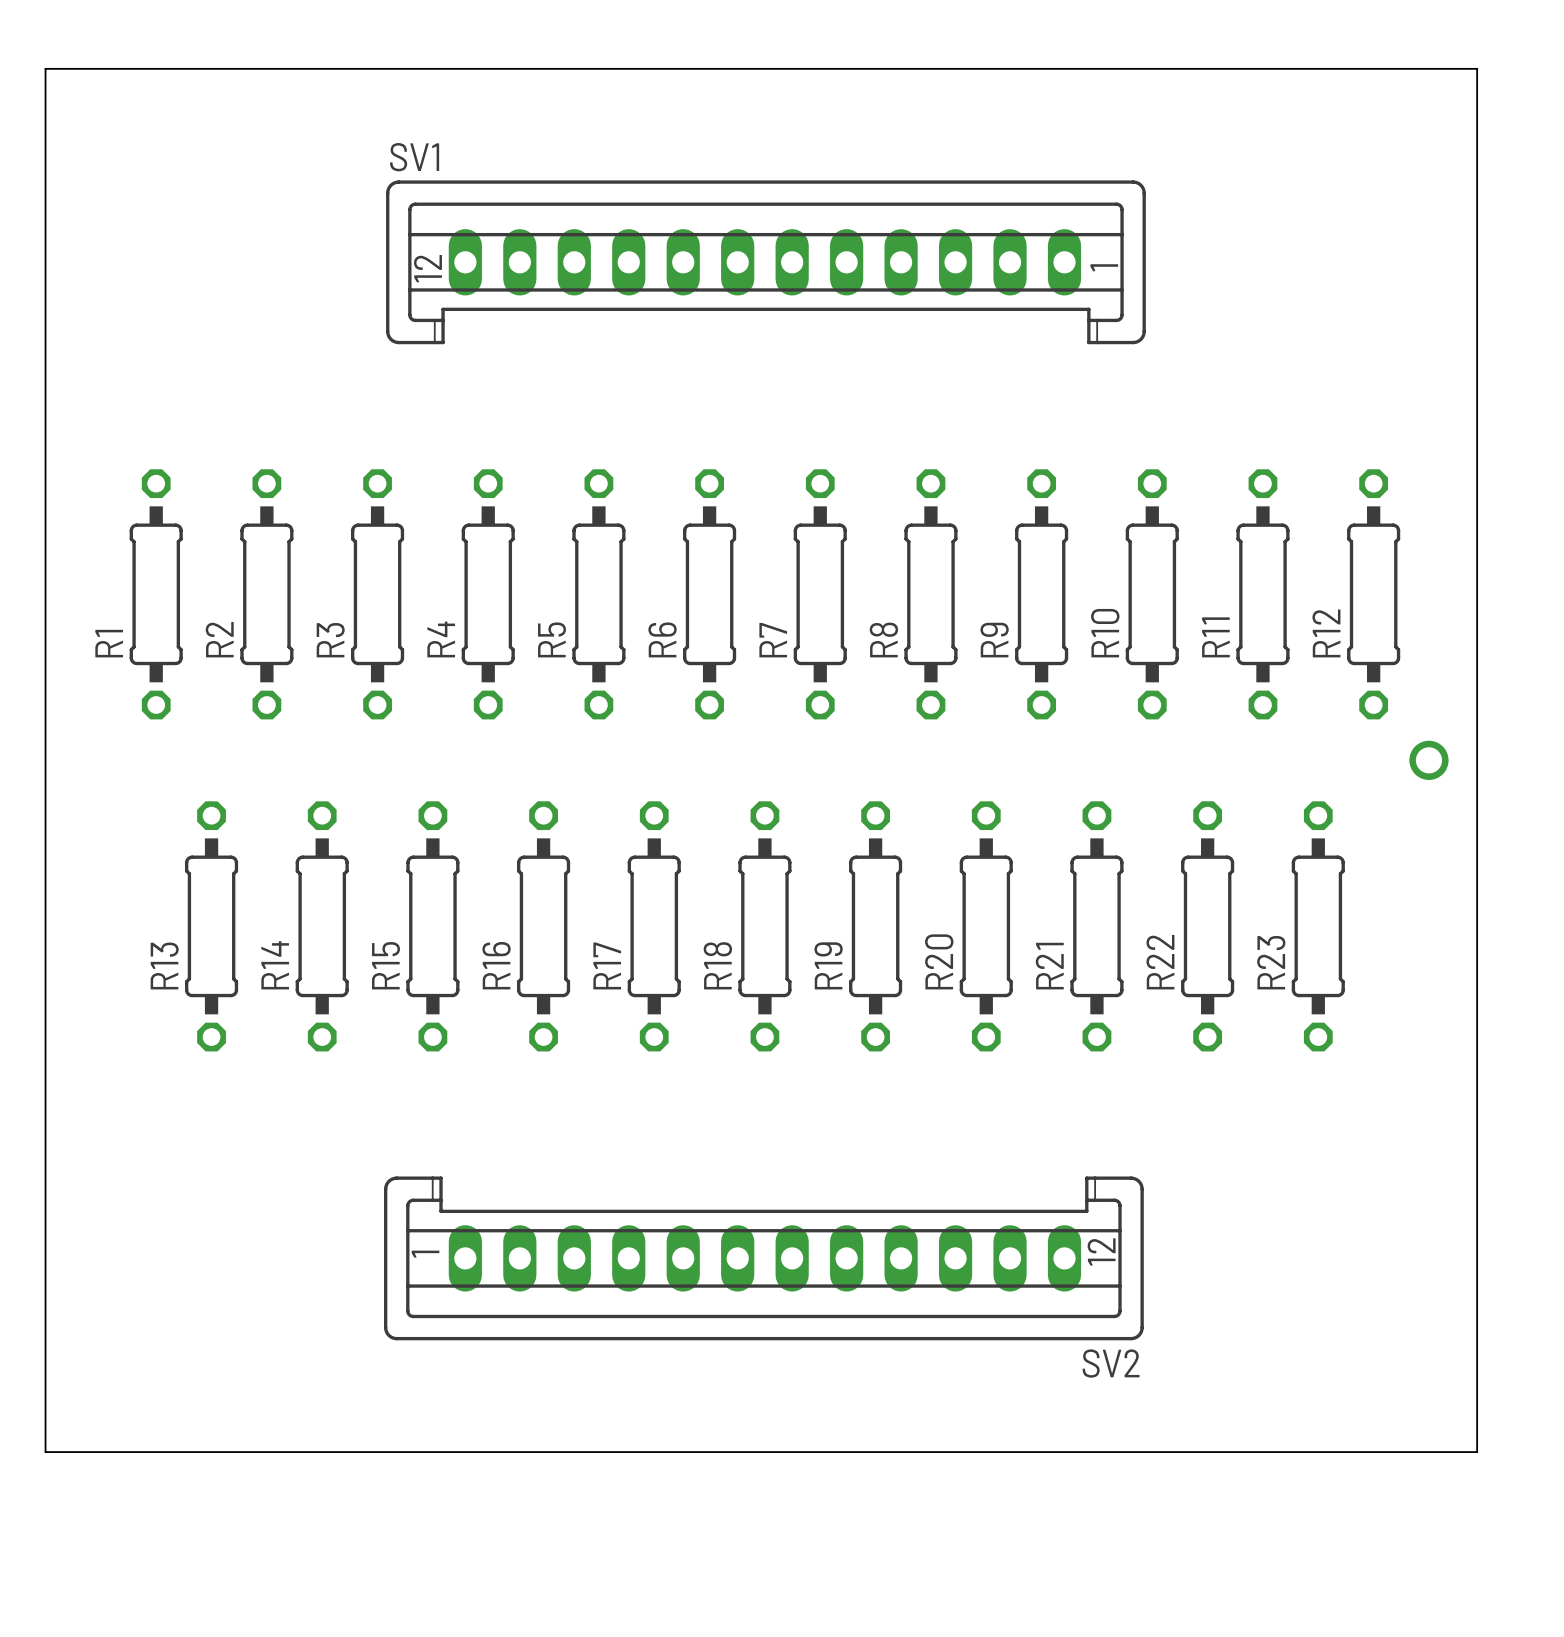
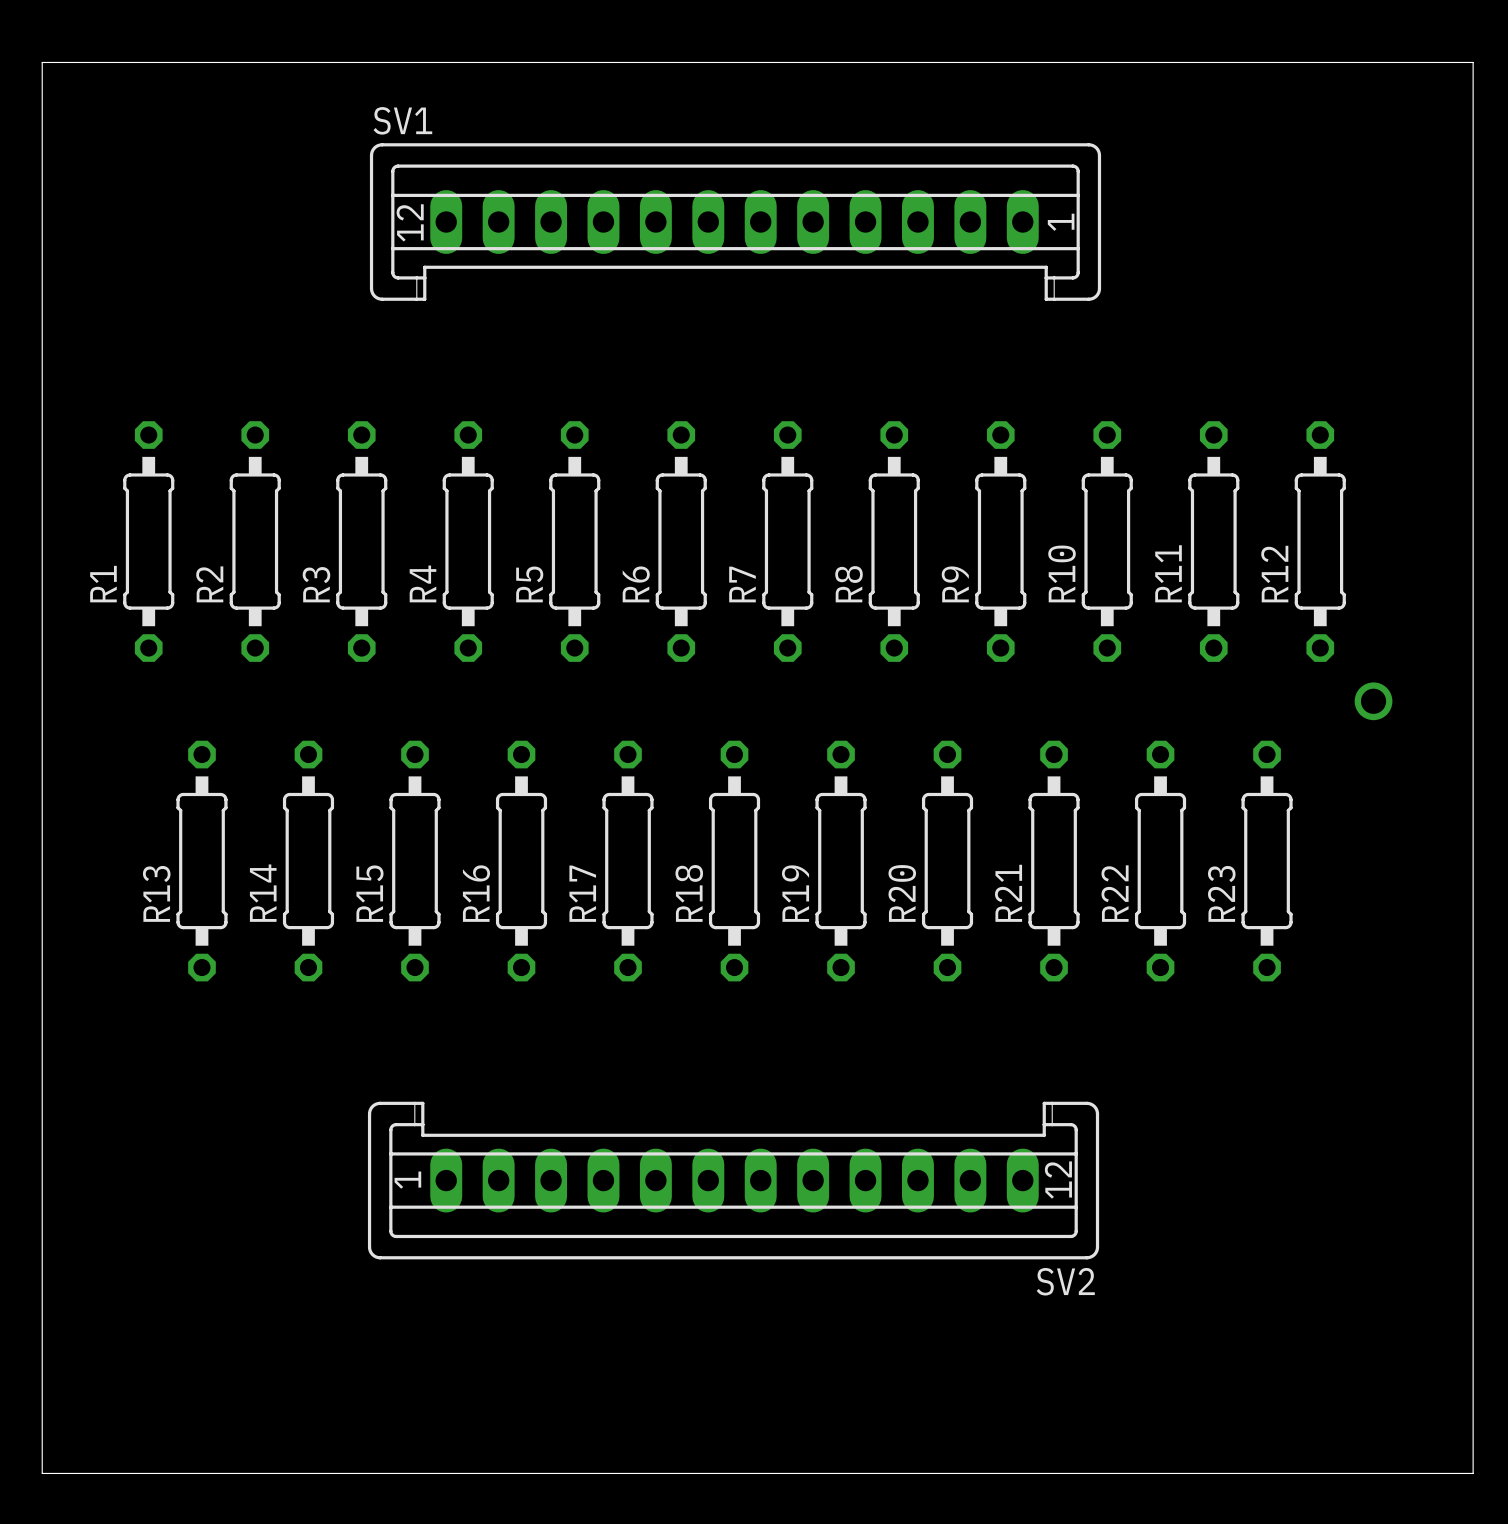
board edge: (45, 96) (45, 68) (1477, 68) (1477, 1452) (45, 1452) -> (42, 62) (1473, 62) (1473, 1473) (42, 1473) (42, 1366)

